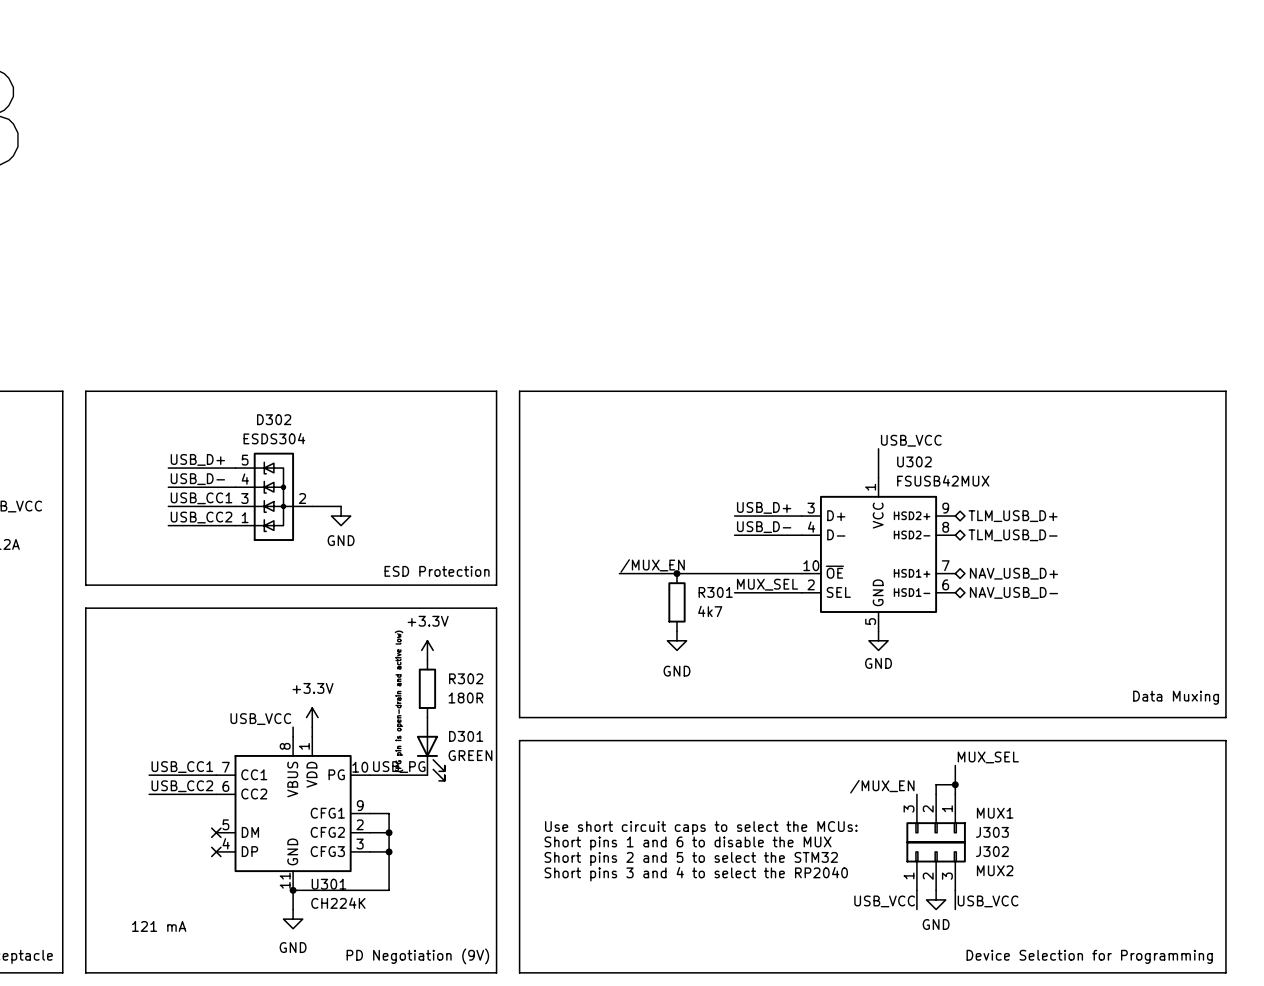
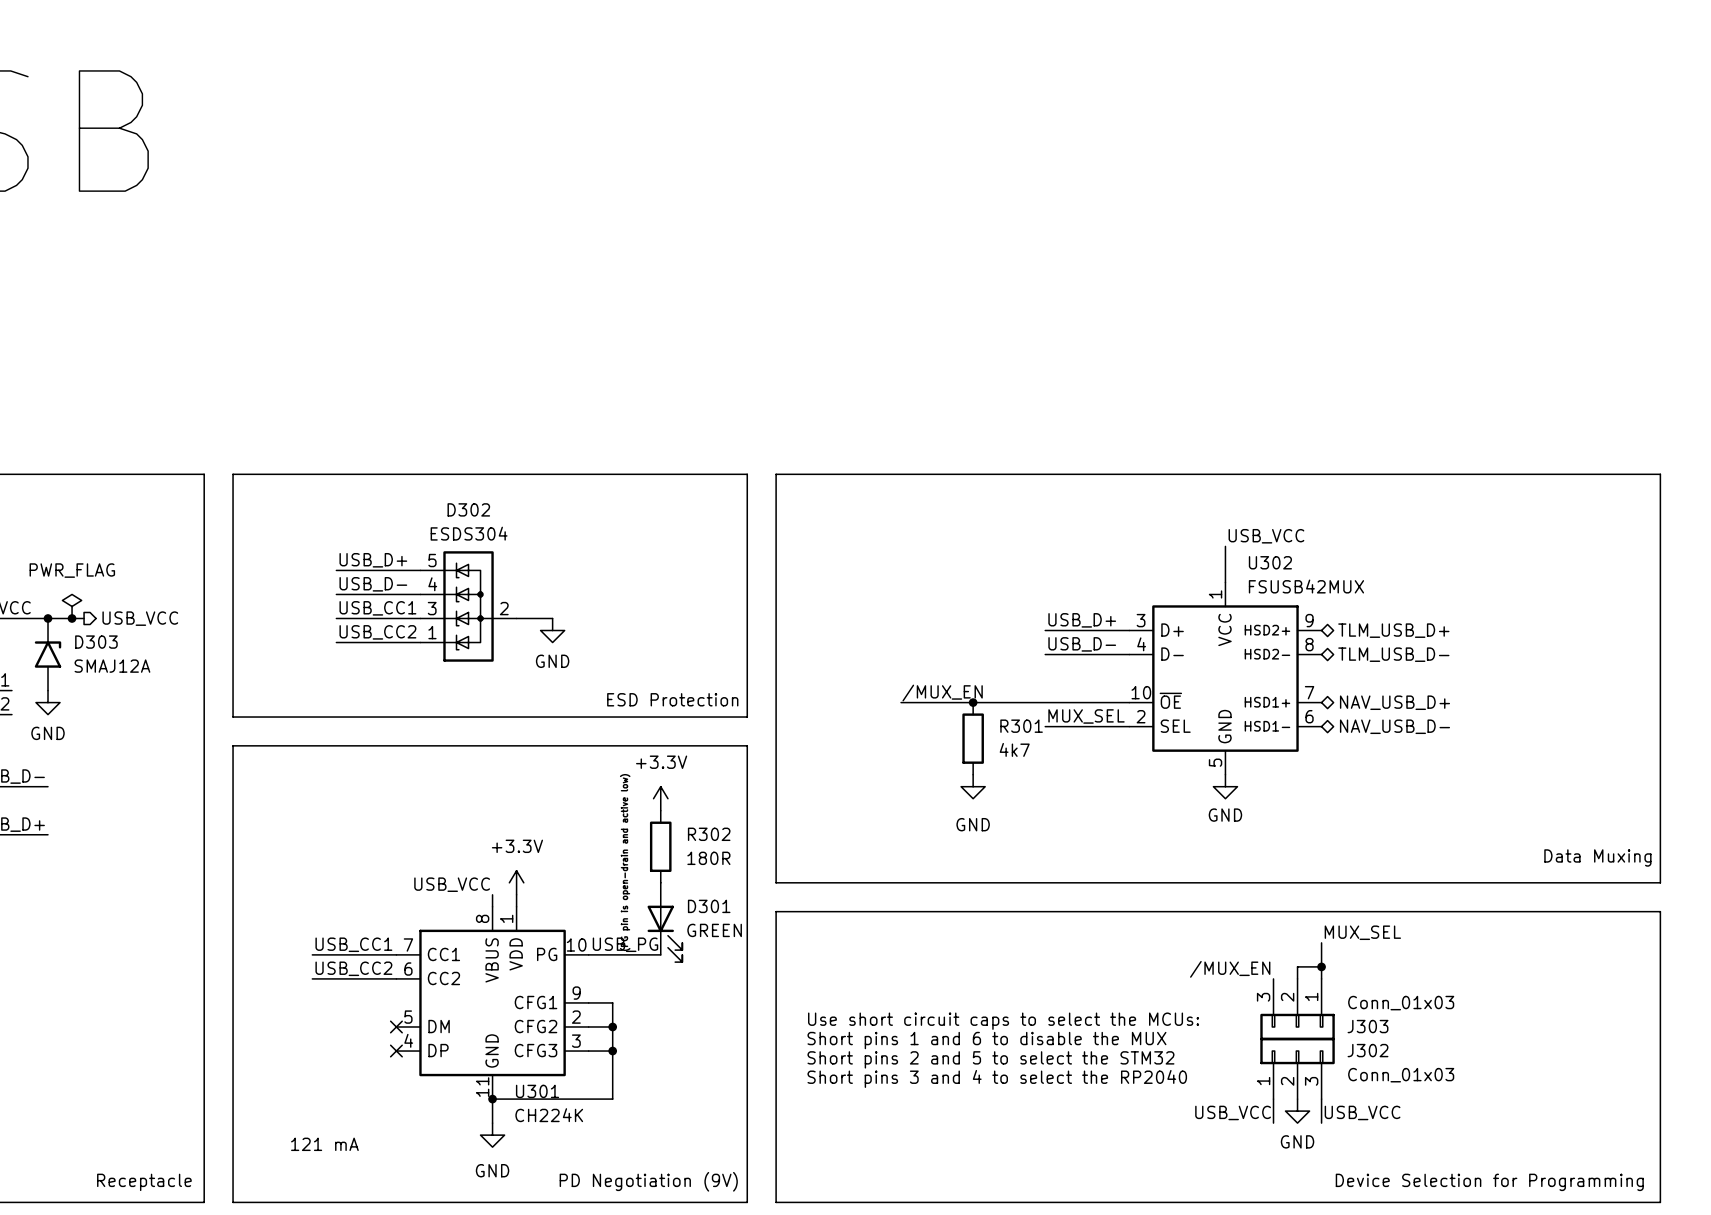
J303 value: MUX1 (995, 813) -> Conn_01x03 (1401, 1003)
J302 value: MUX2 (995, 870) -> Conn_01x03 (1401, 1075)

